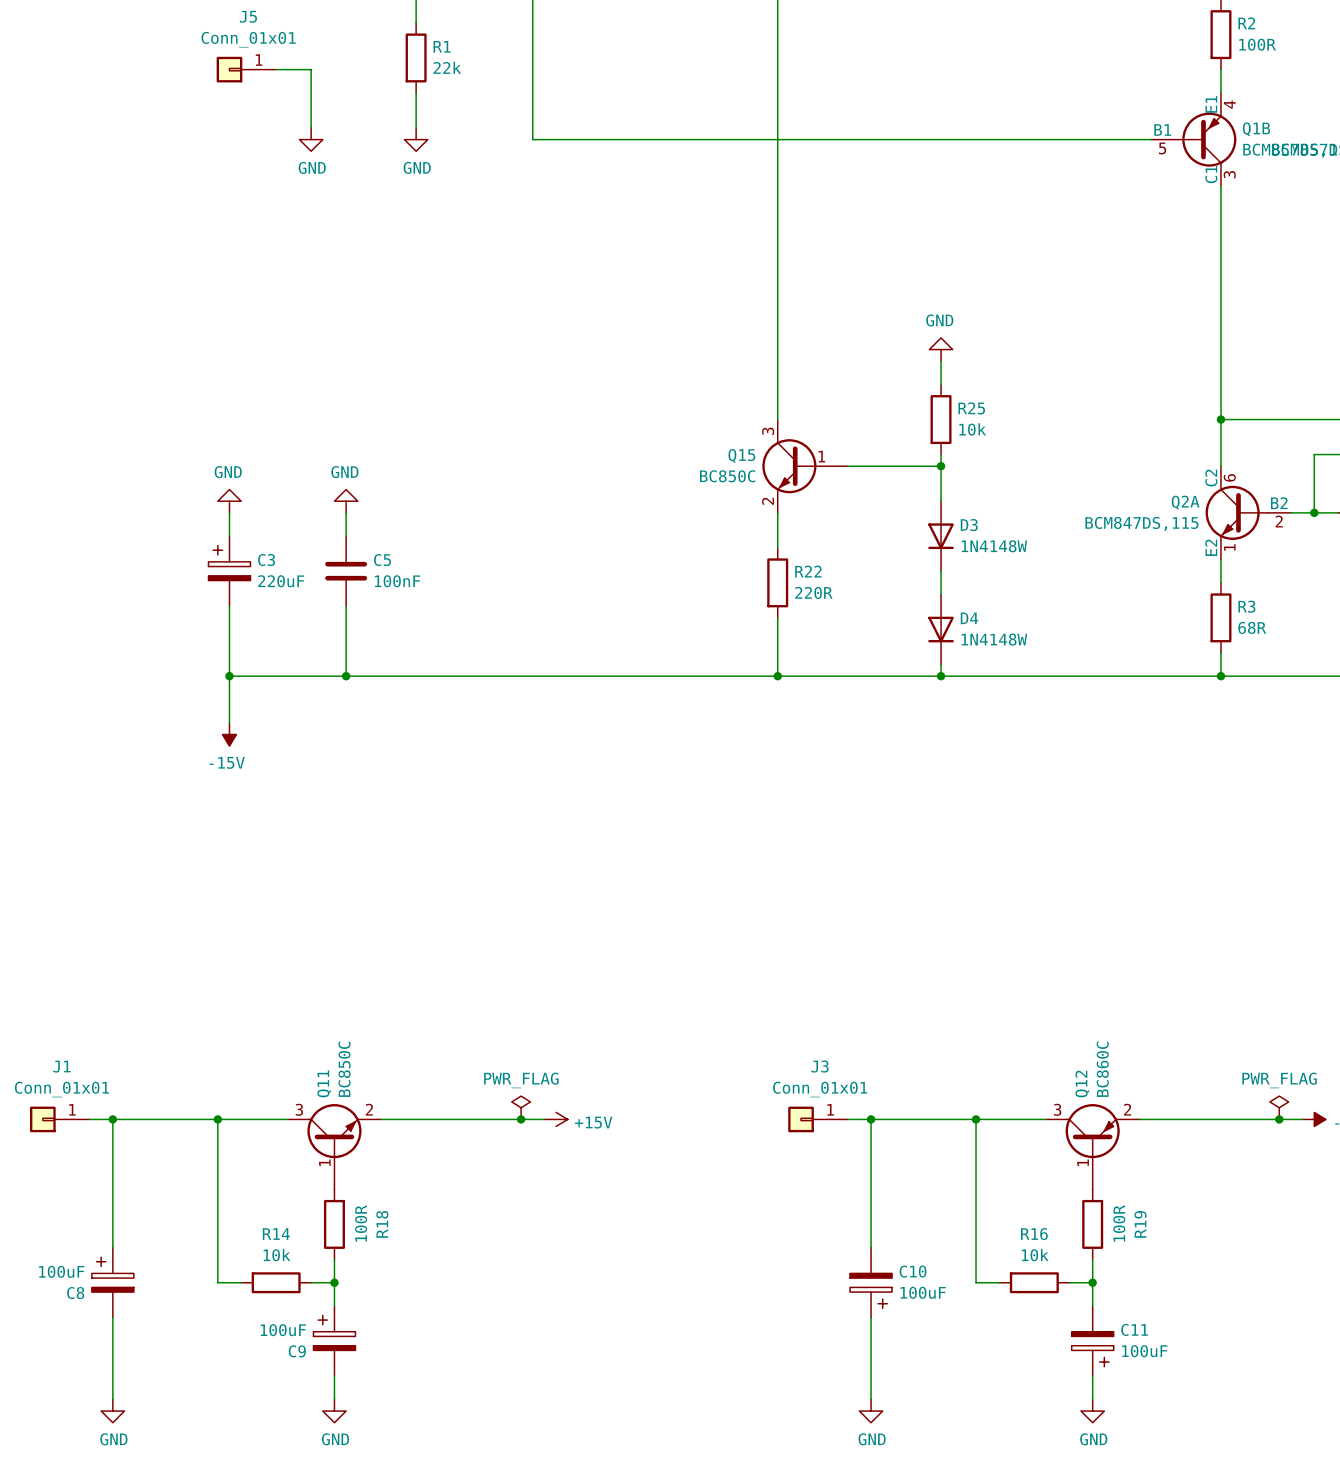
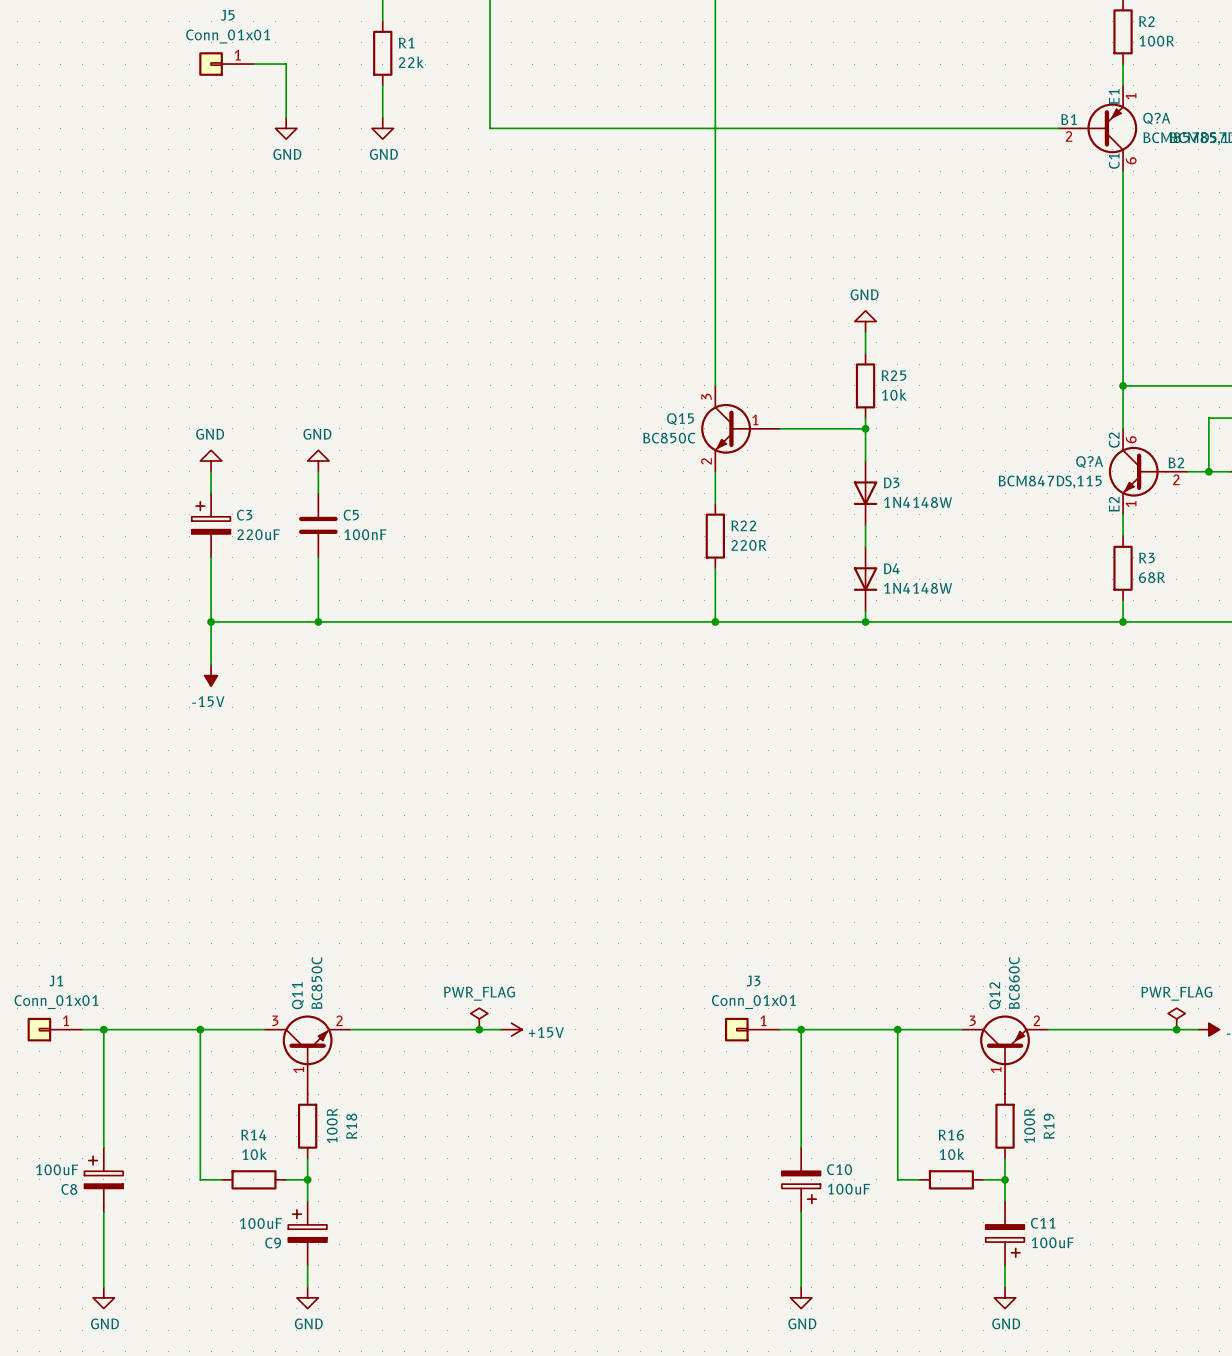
Q1B pin number: 4 (1229, 104) -> 1 (1131, 96)
Q1B name: Q1B (1256, 129) -> Q?A (1156, 118)
Q1B pin number: 5 (1162, 148) -> 2 (1069, 136)
Q1B pin number: 3 (1229, 174) -> 6 (1131, 160)
Q2A name: Q2A (1185, 502) -> Q?A (1089, 461)

